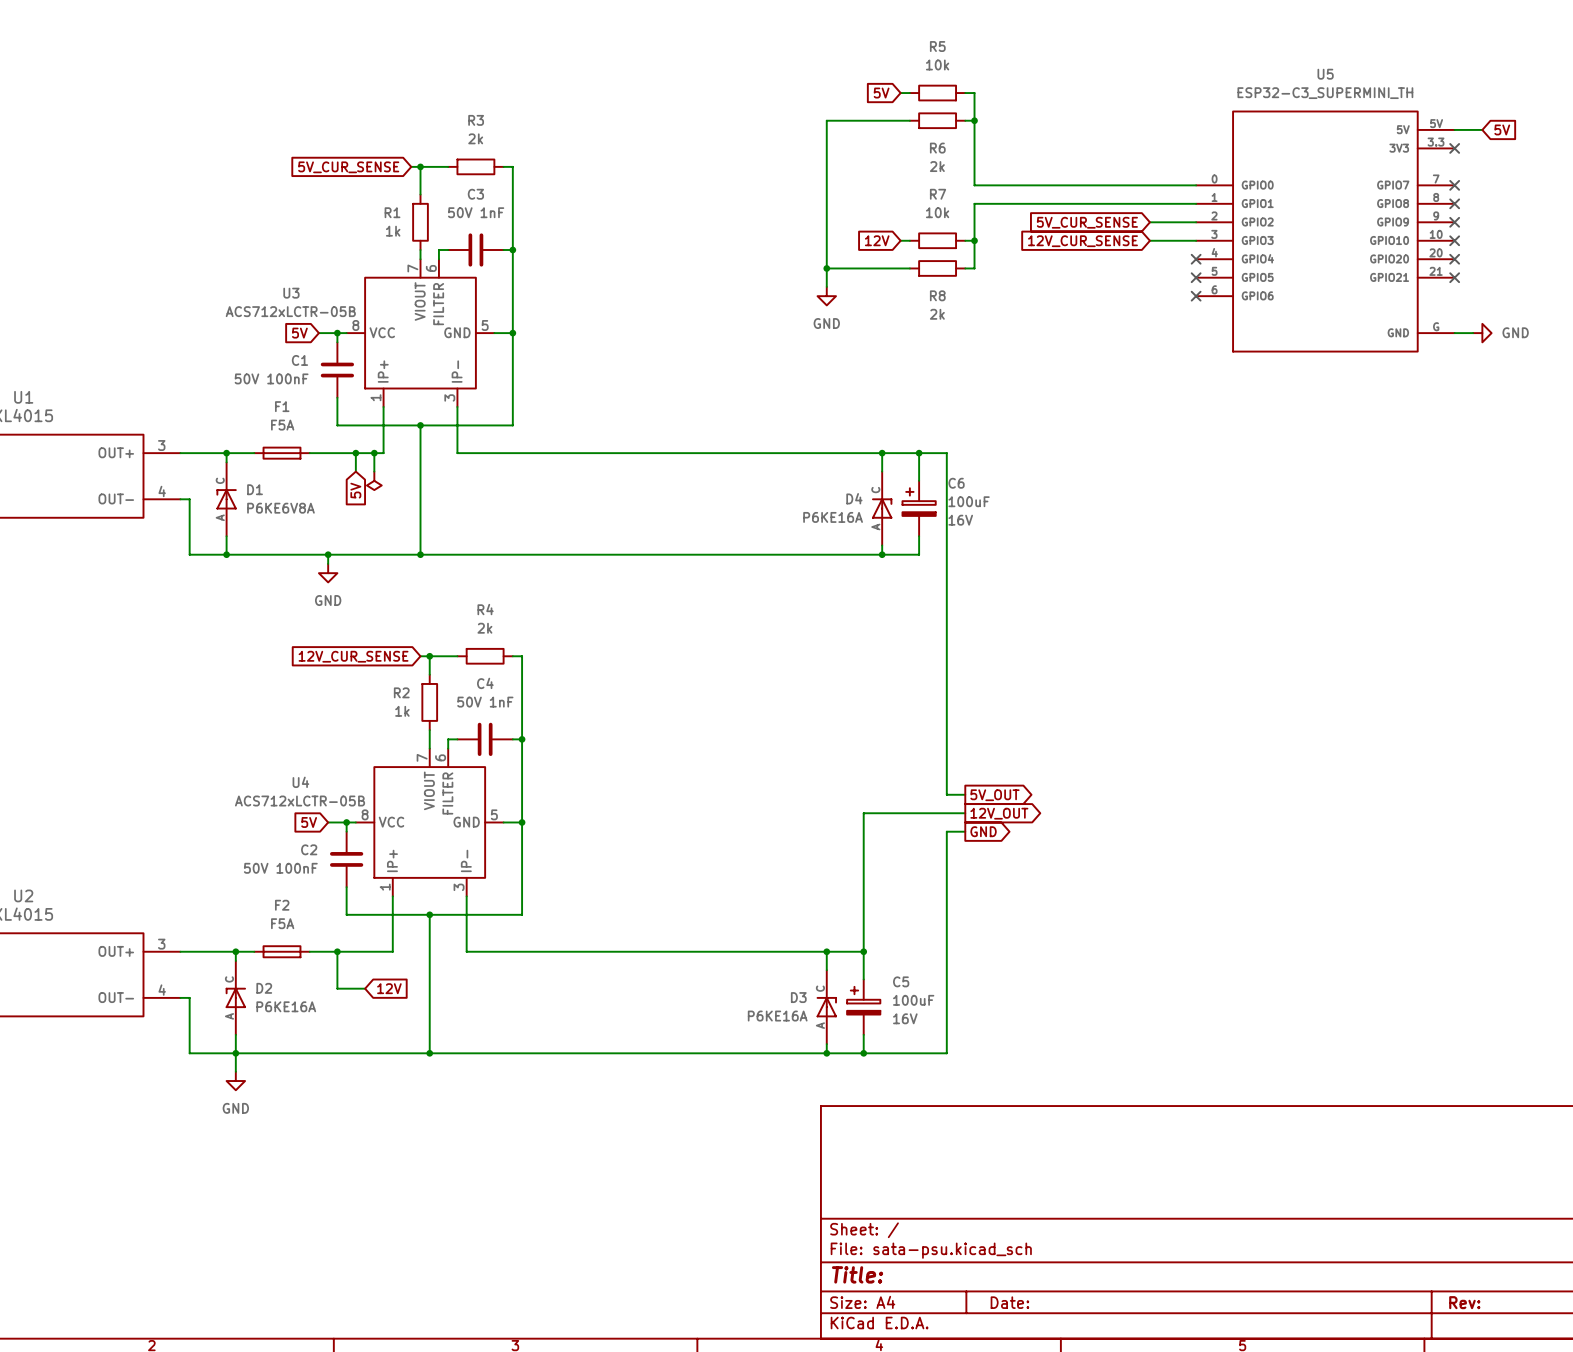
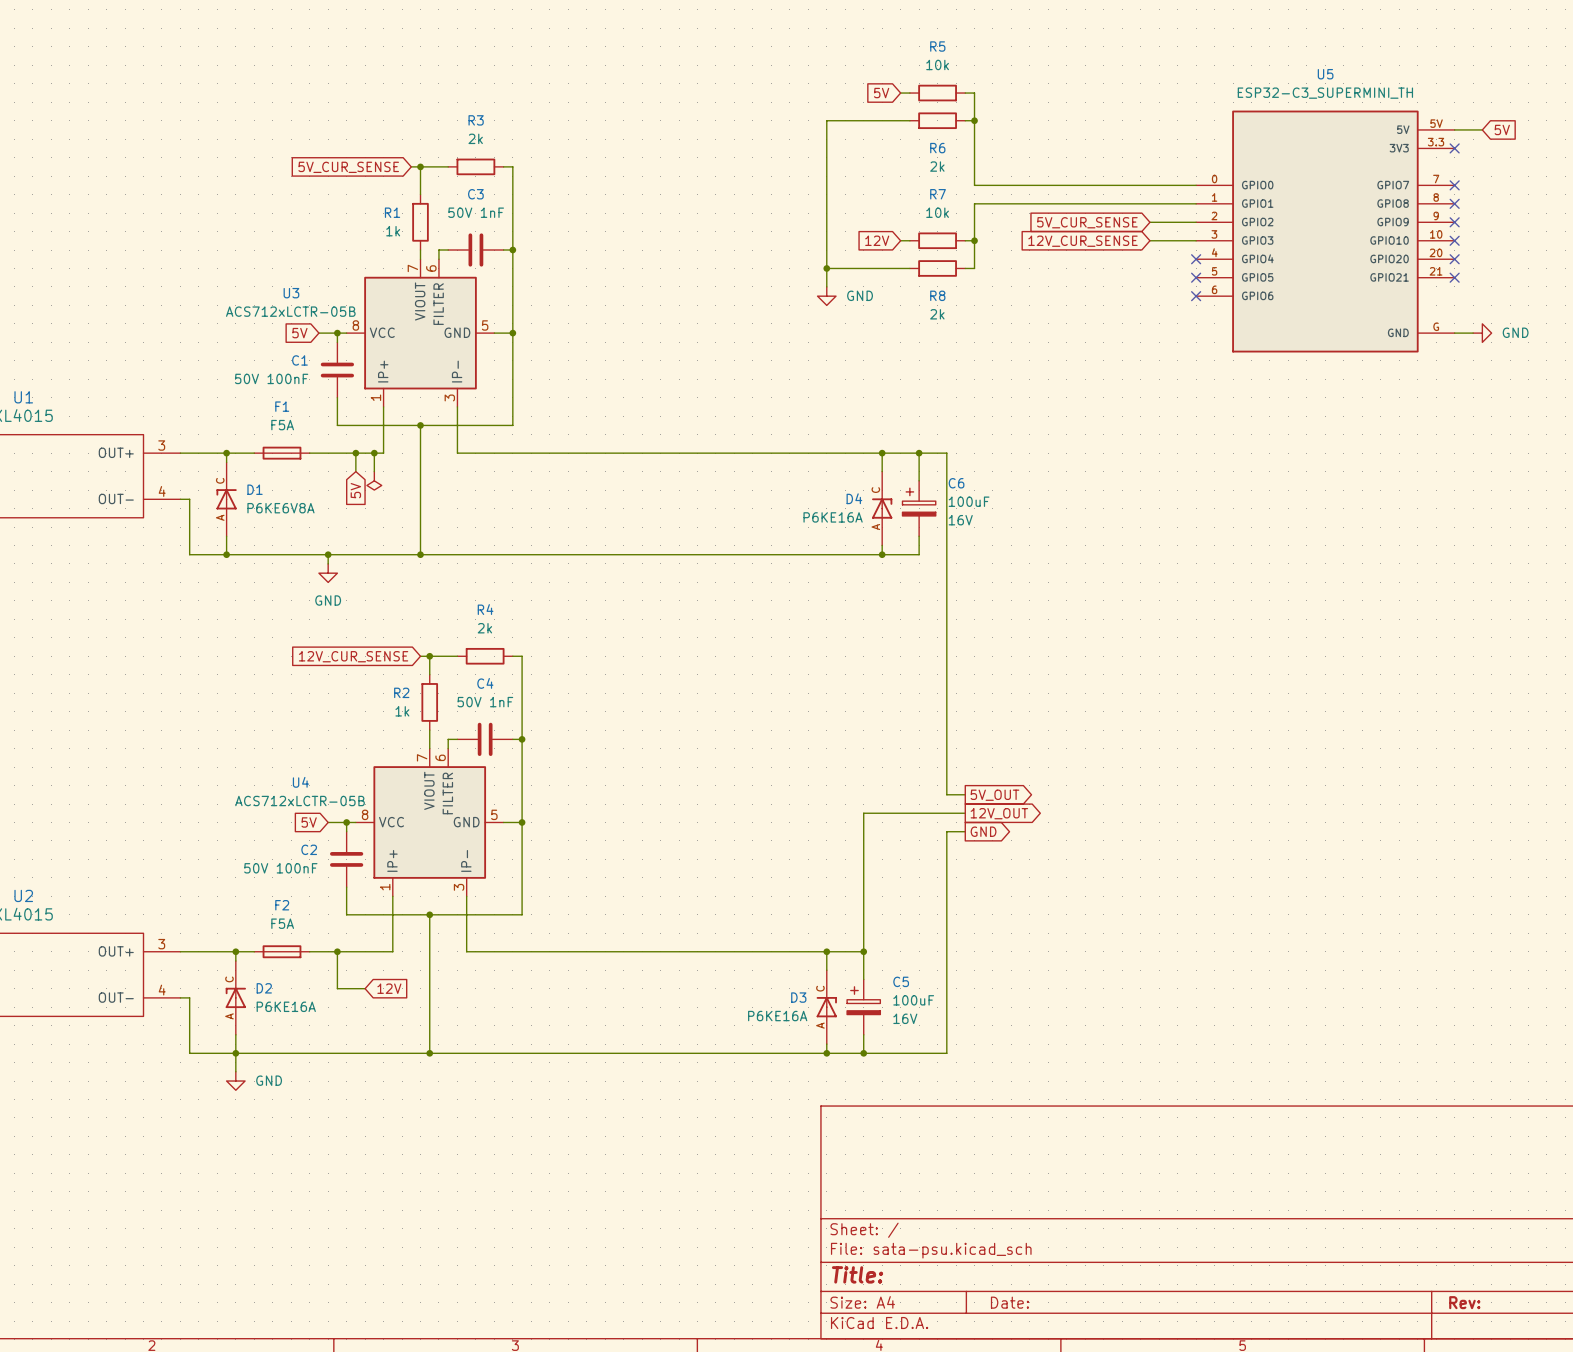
power symbol text position: GND (826, 323) -> GND (860, 295)
power symbol text position: GND (235, 1108) -> GND (269, 1080)

